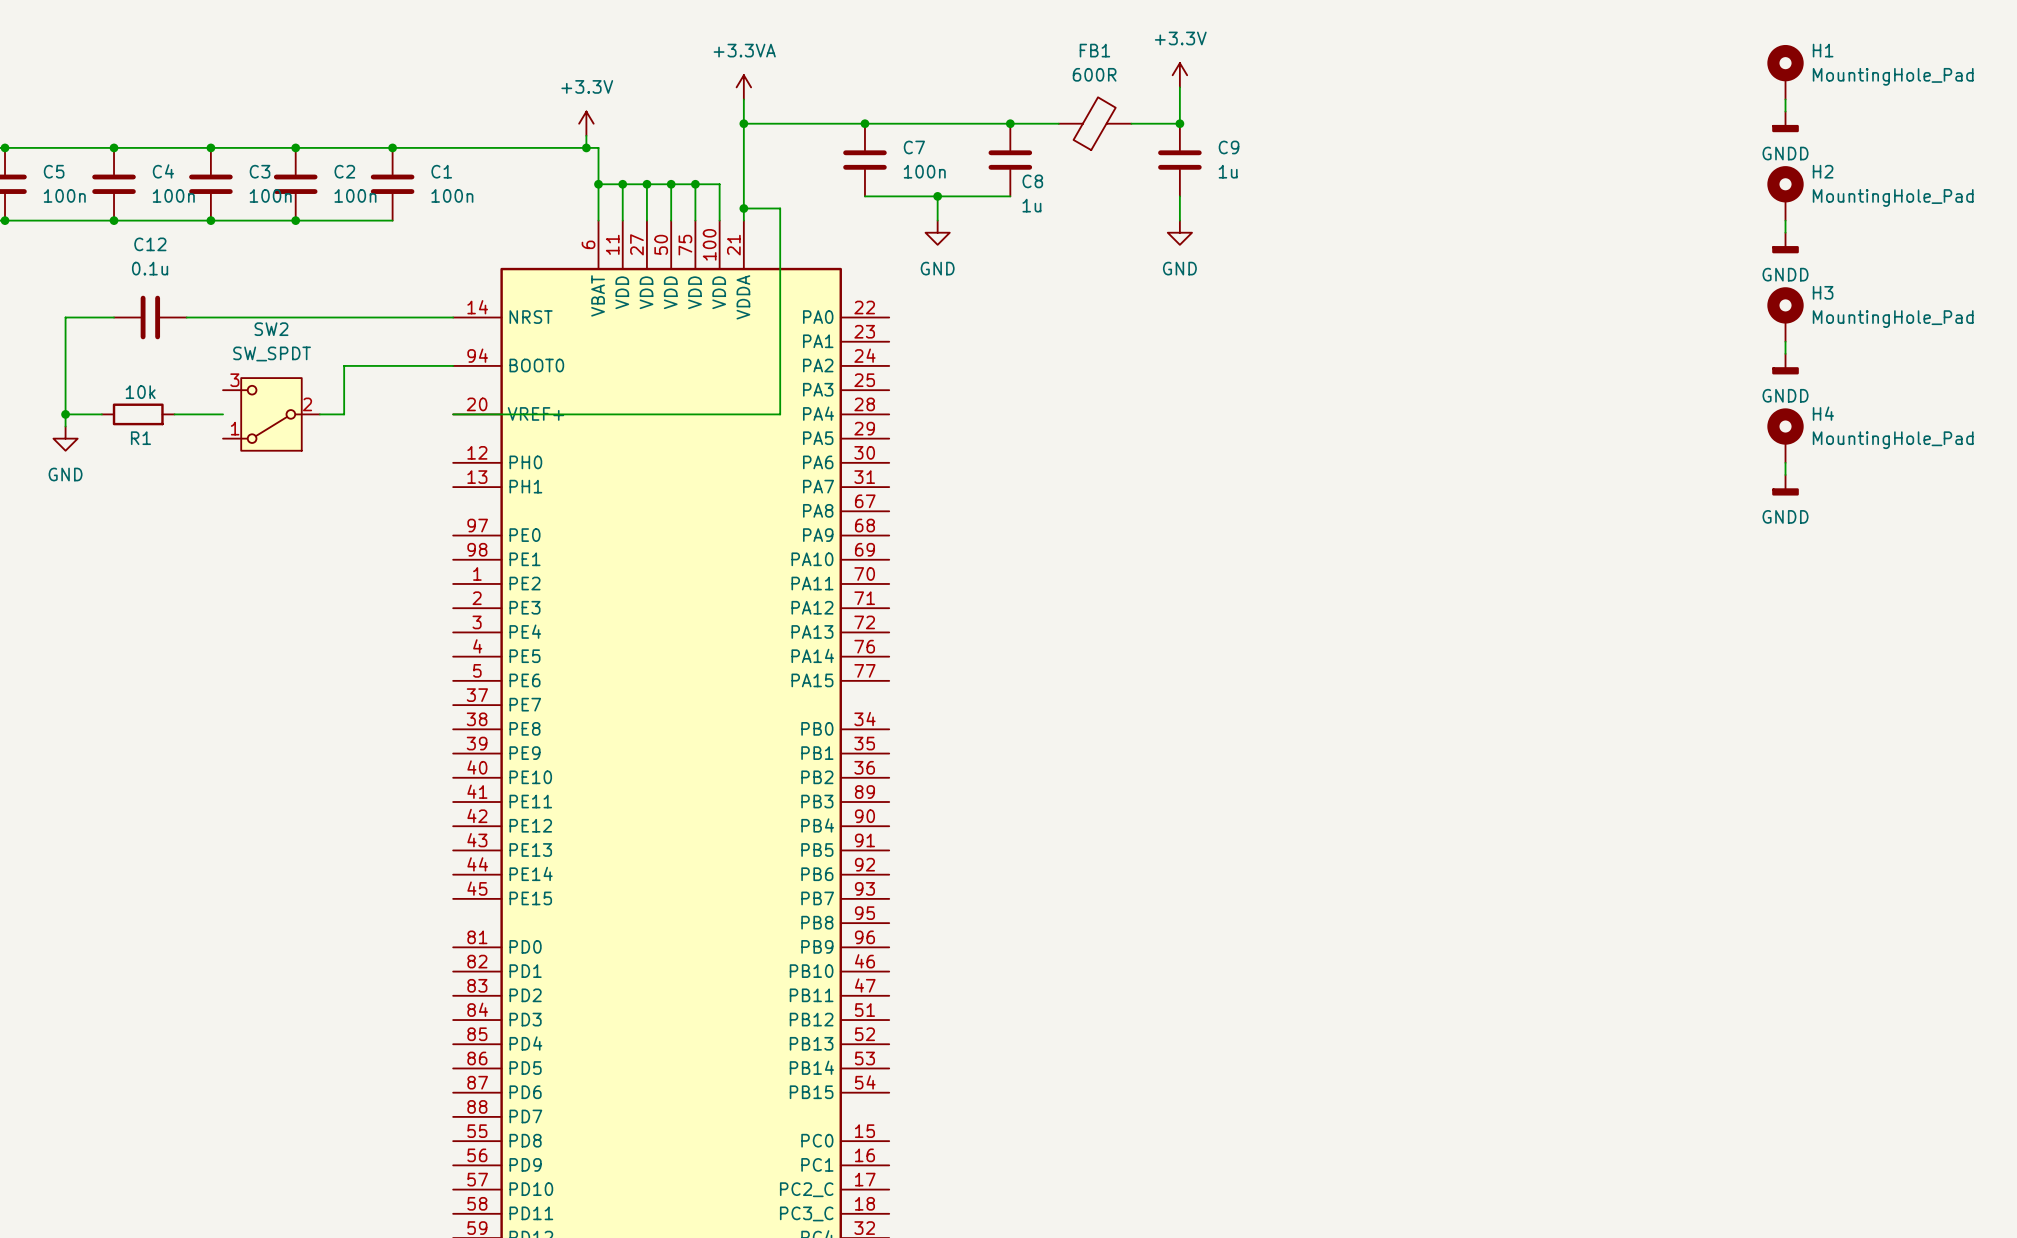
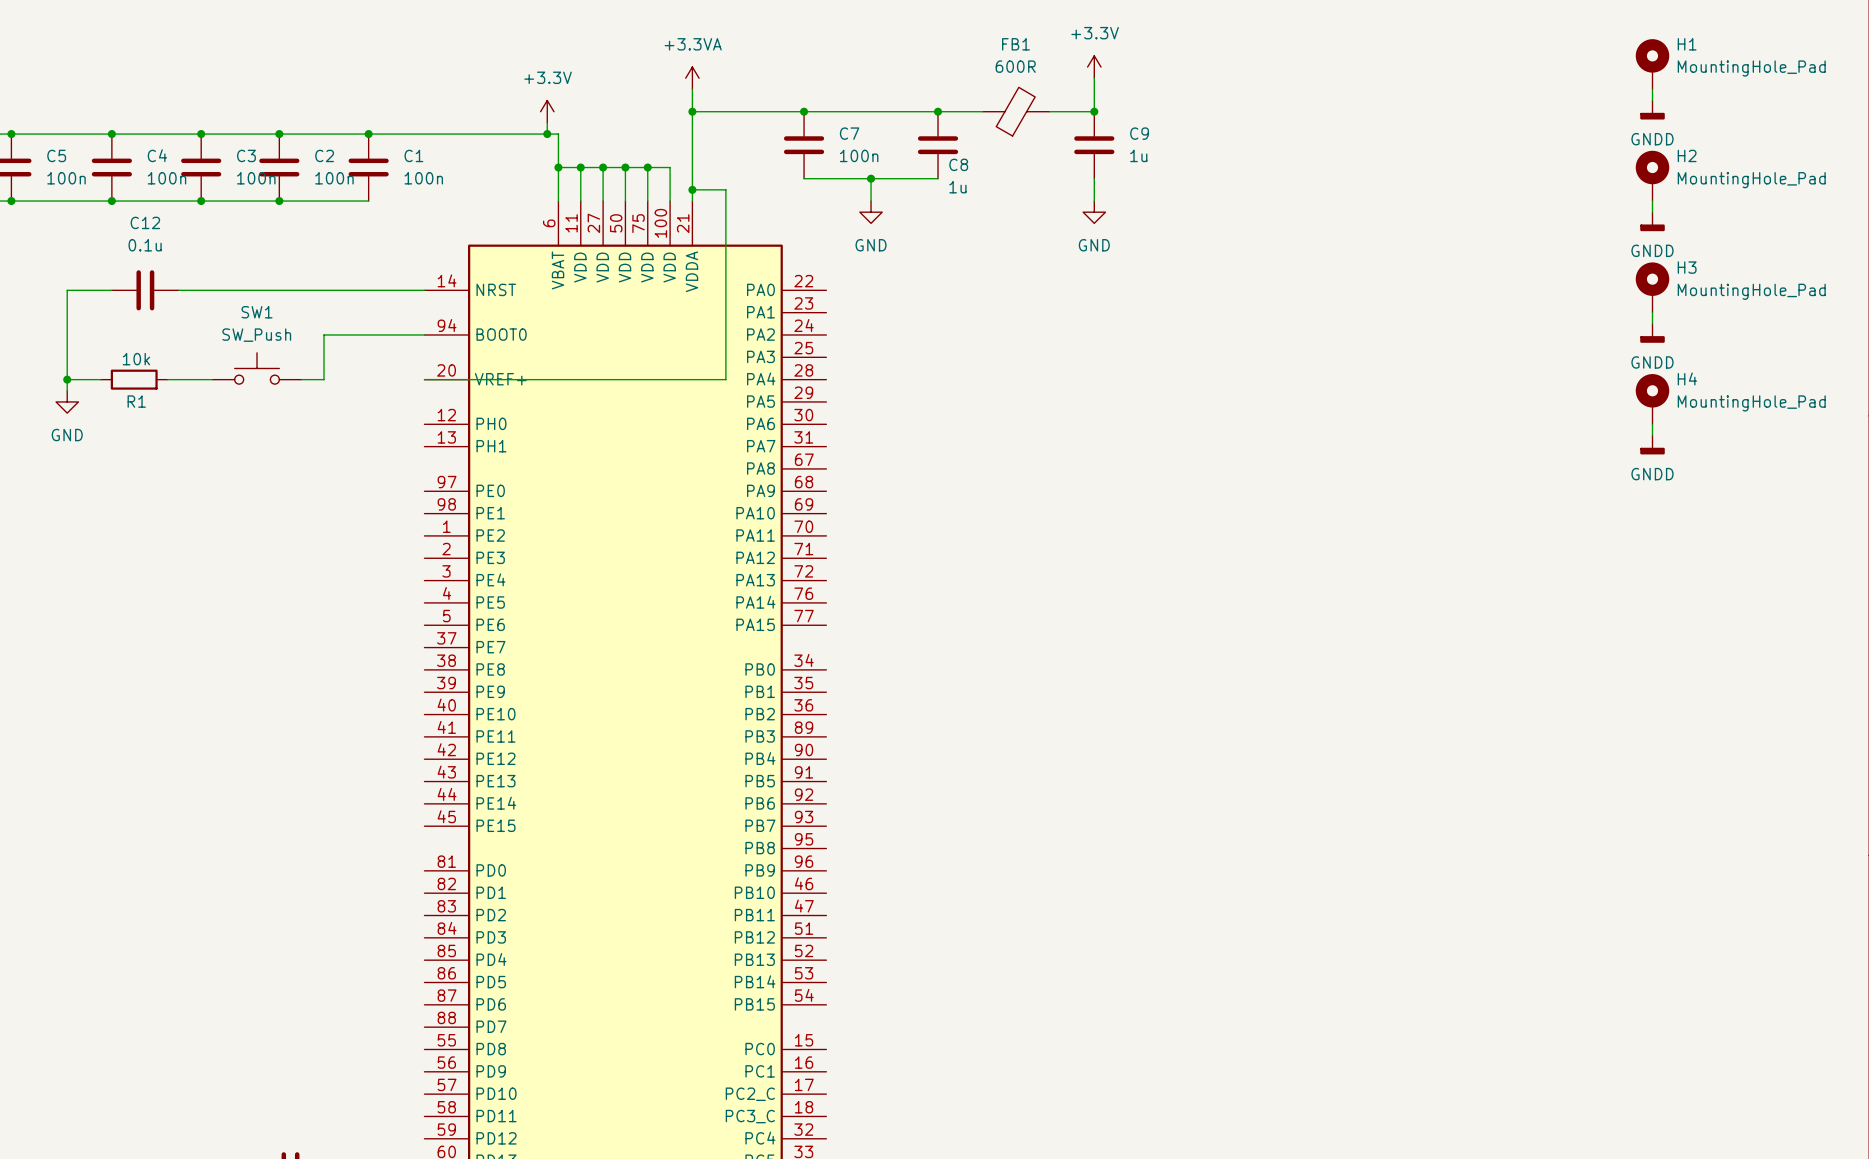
SW1: none -> SW_Push (257, 368)
SW2: SW_SPDT (271, 414) -> none

